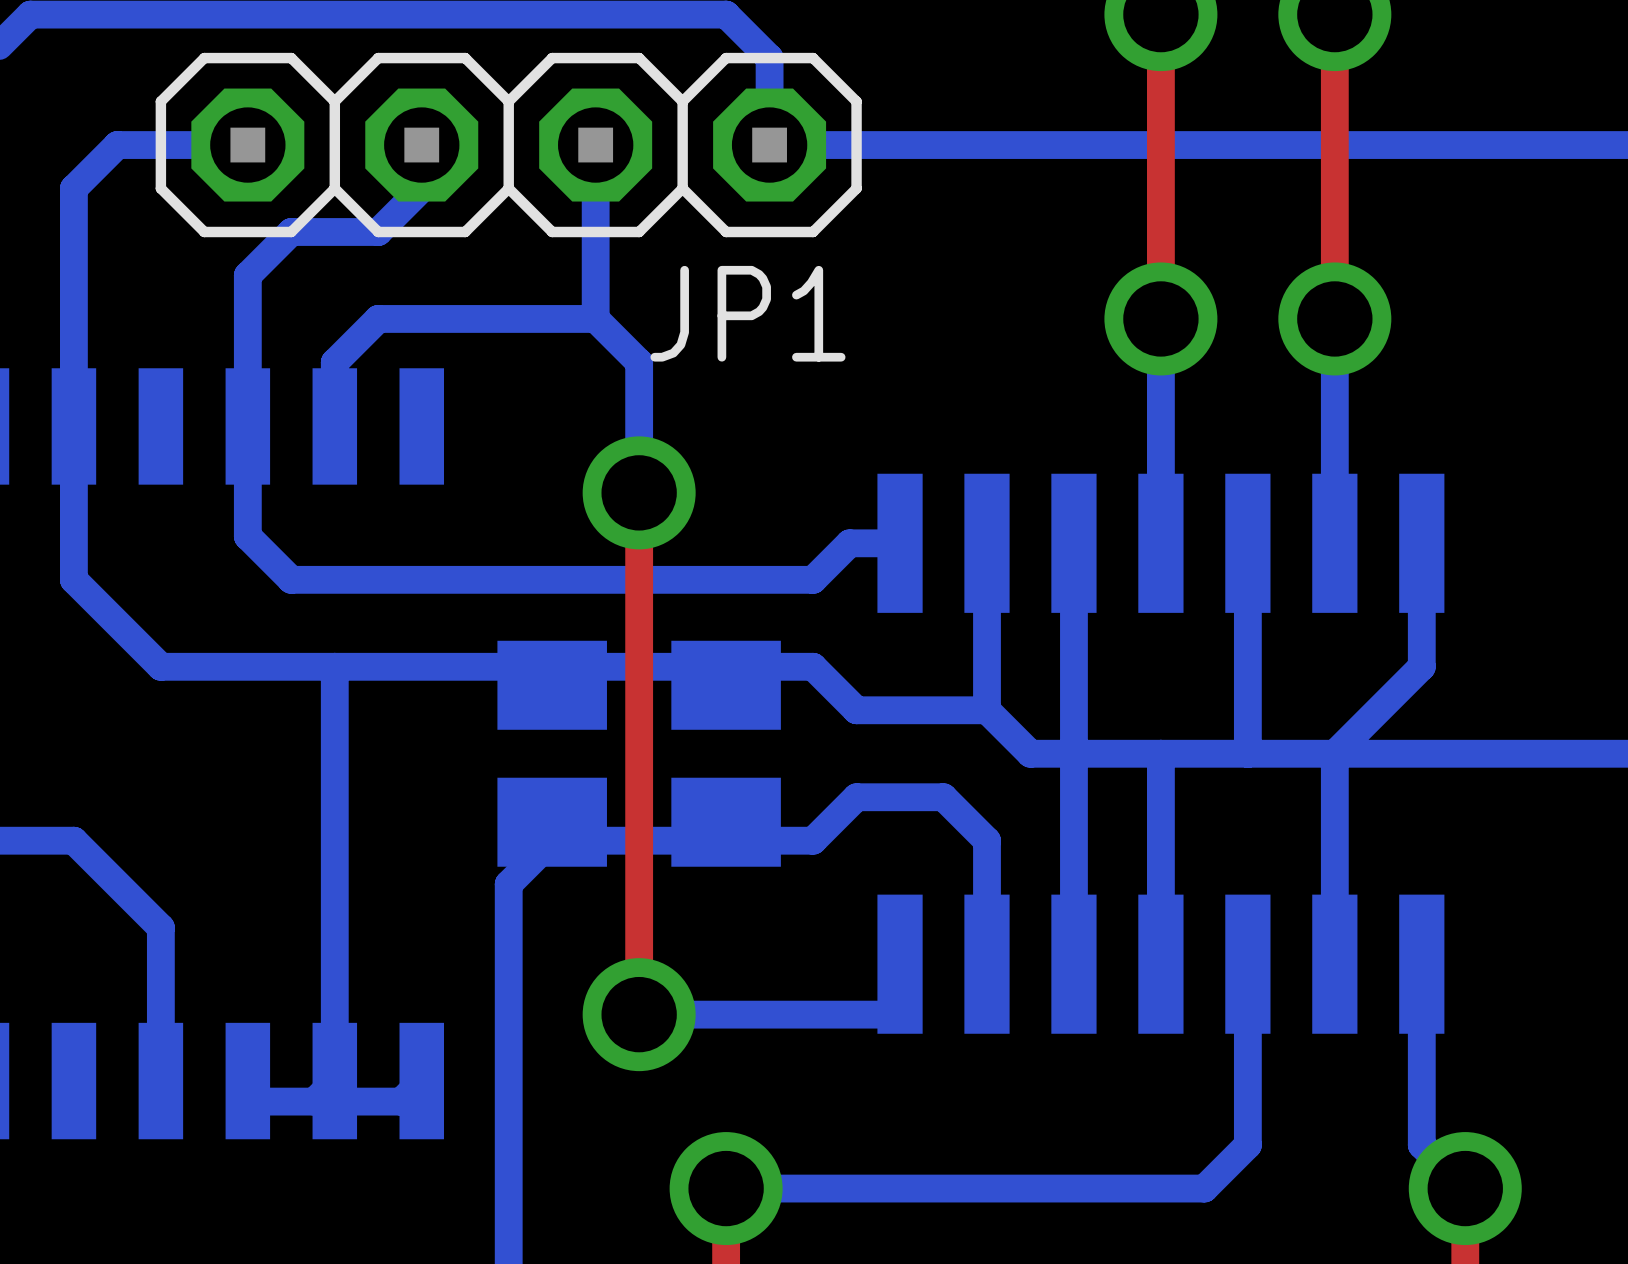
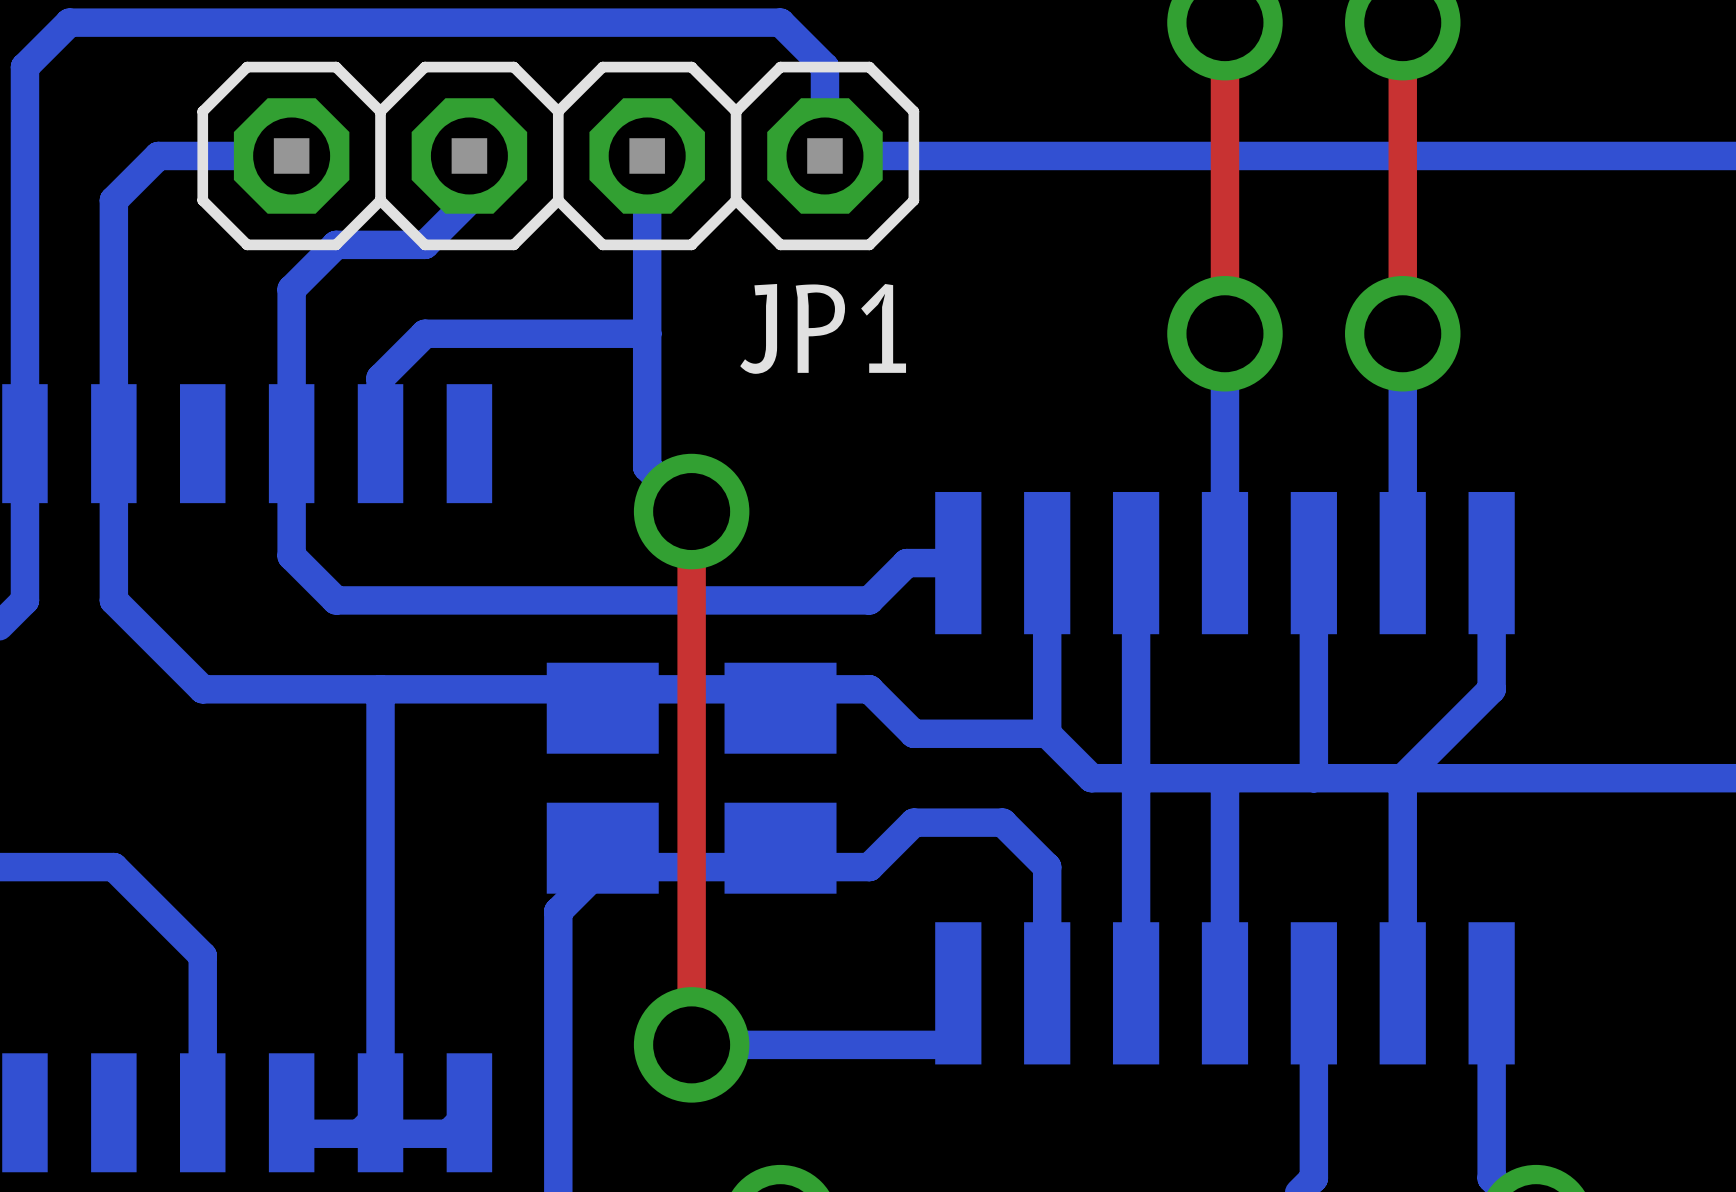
bottom track: (595, 318) (639, 362) (639, 492) -> (647, 333) (647, 467) (691, 511)

